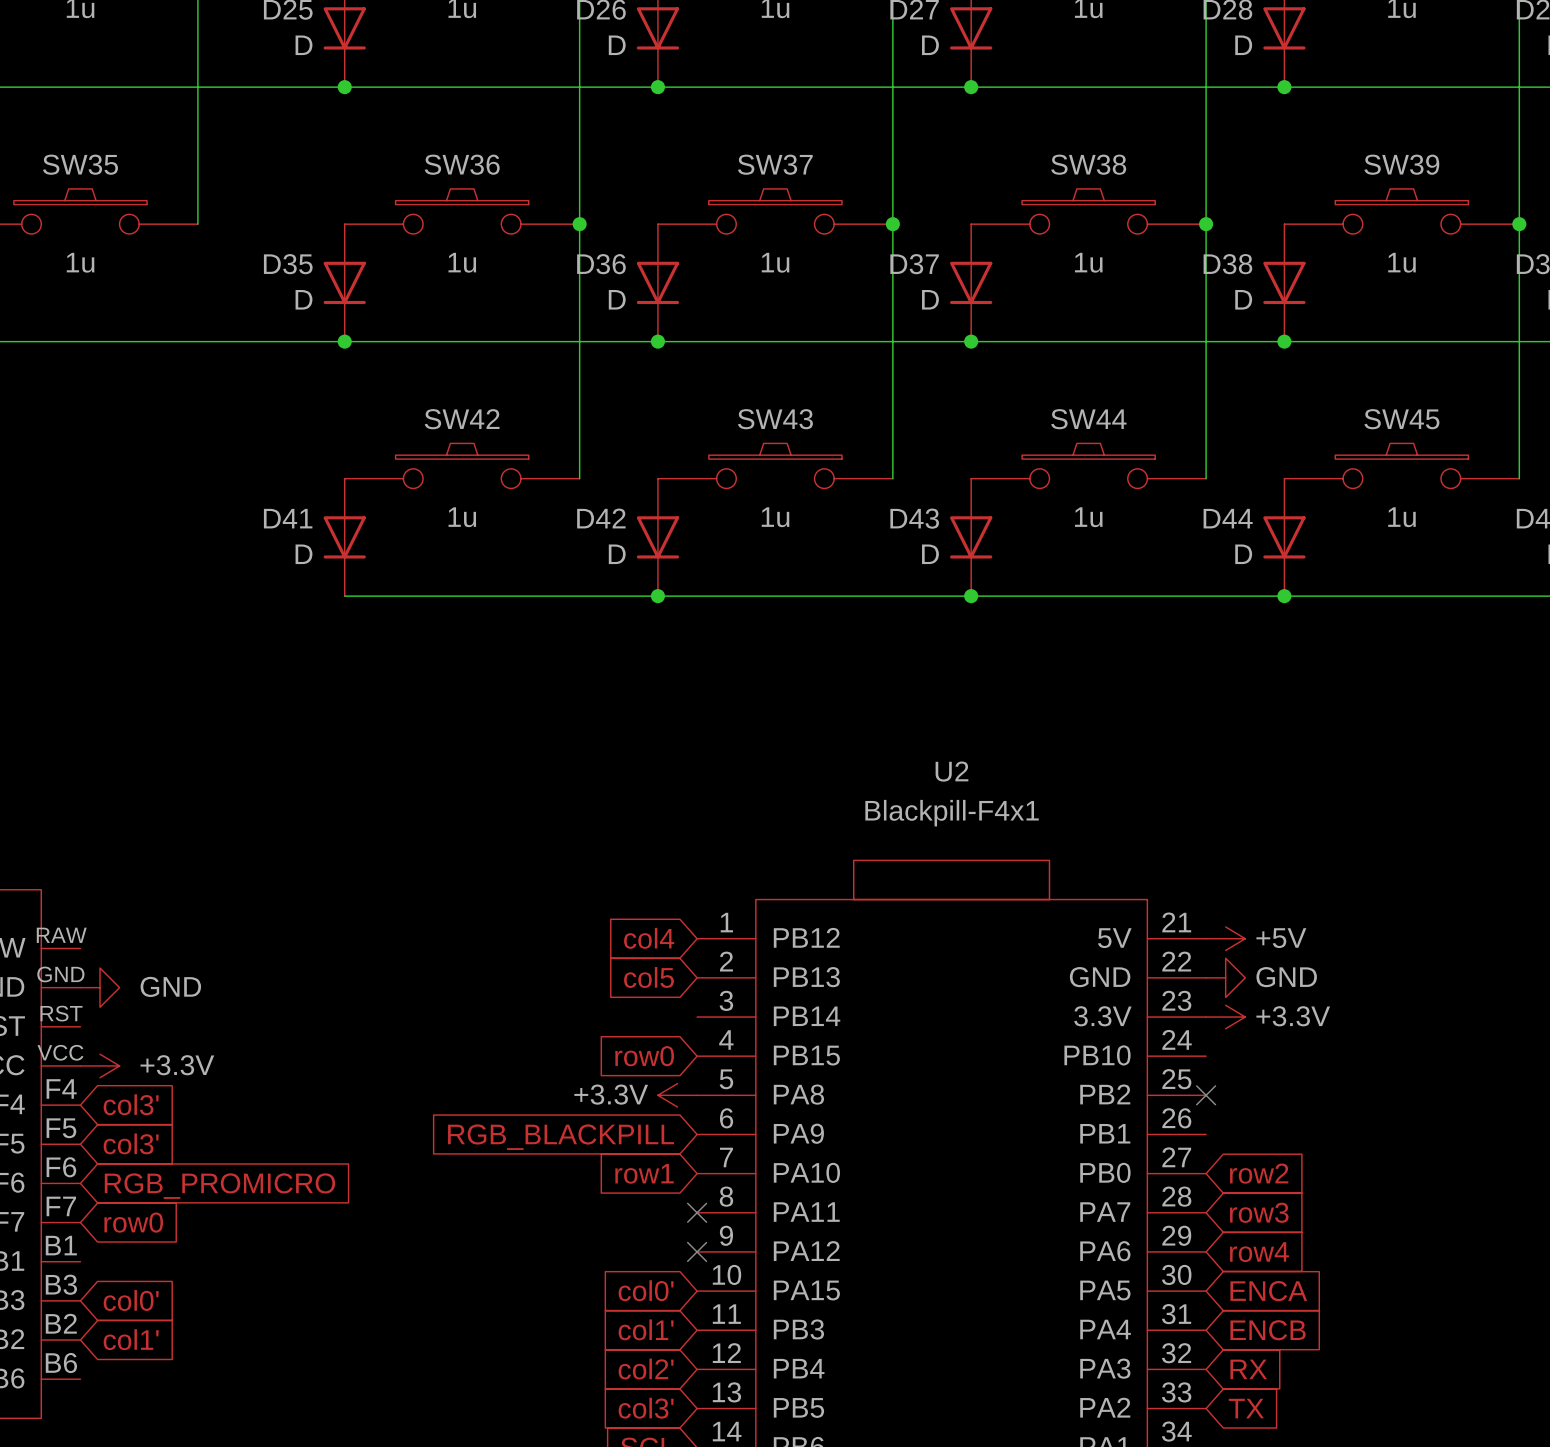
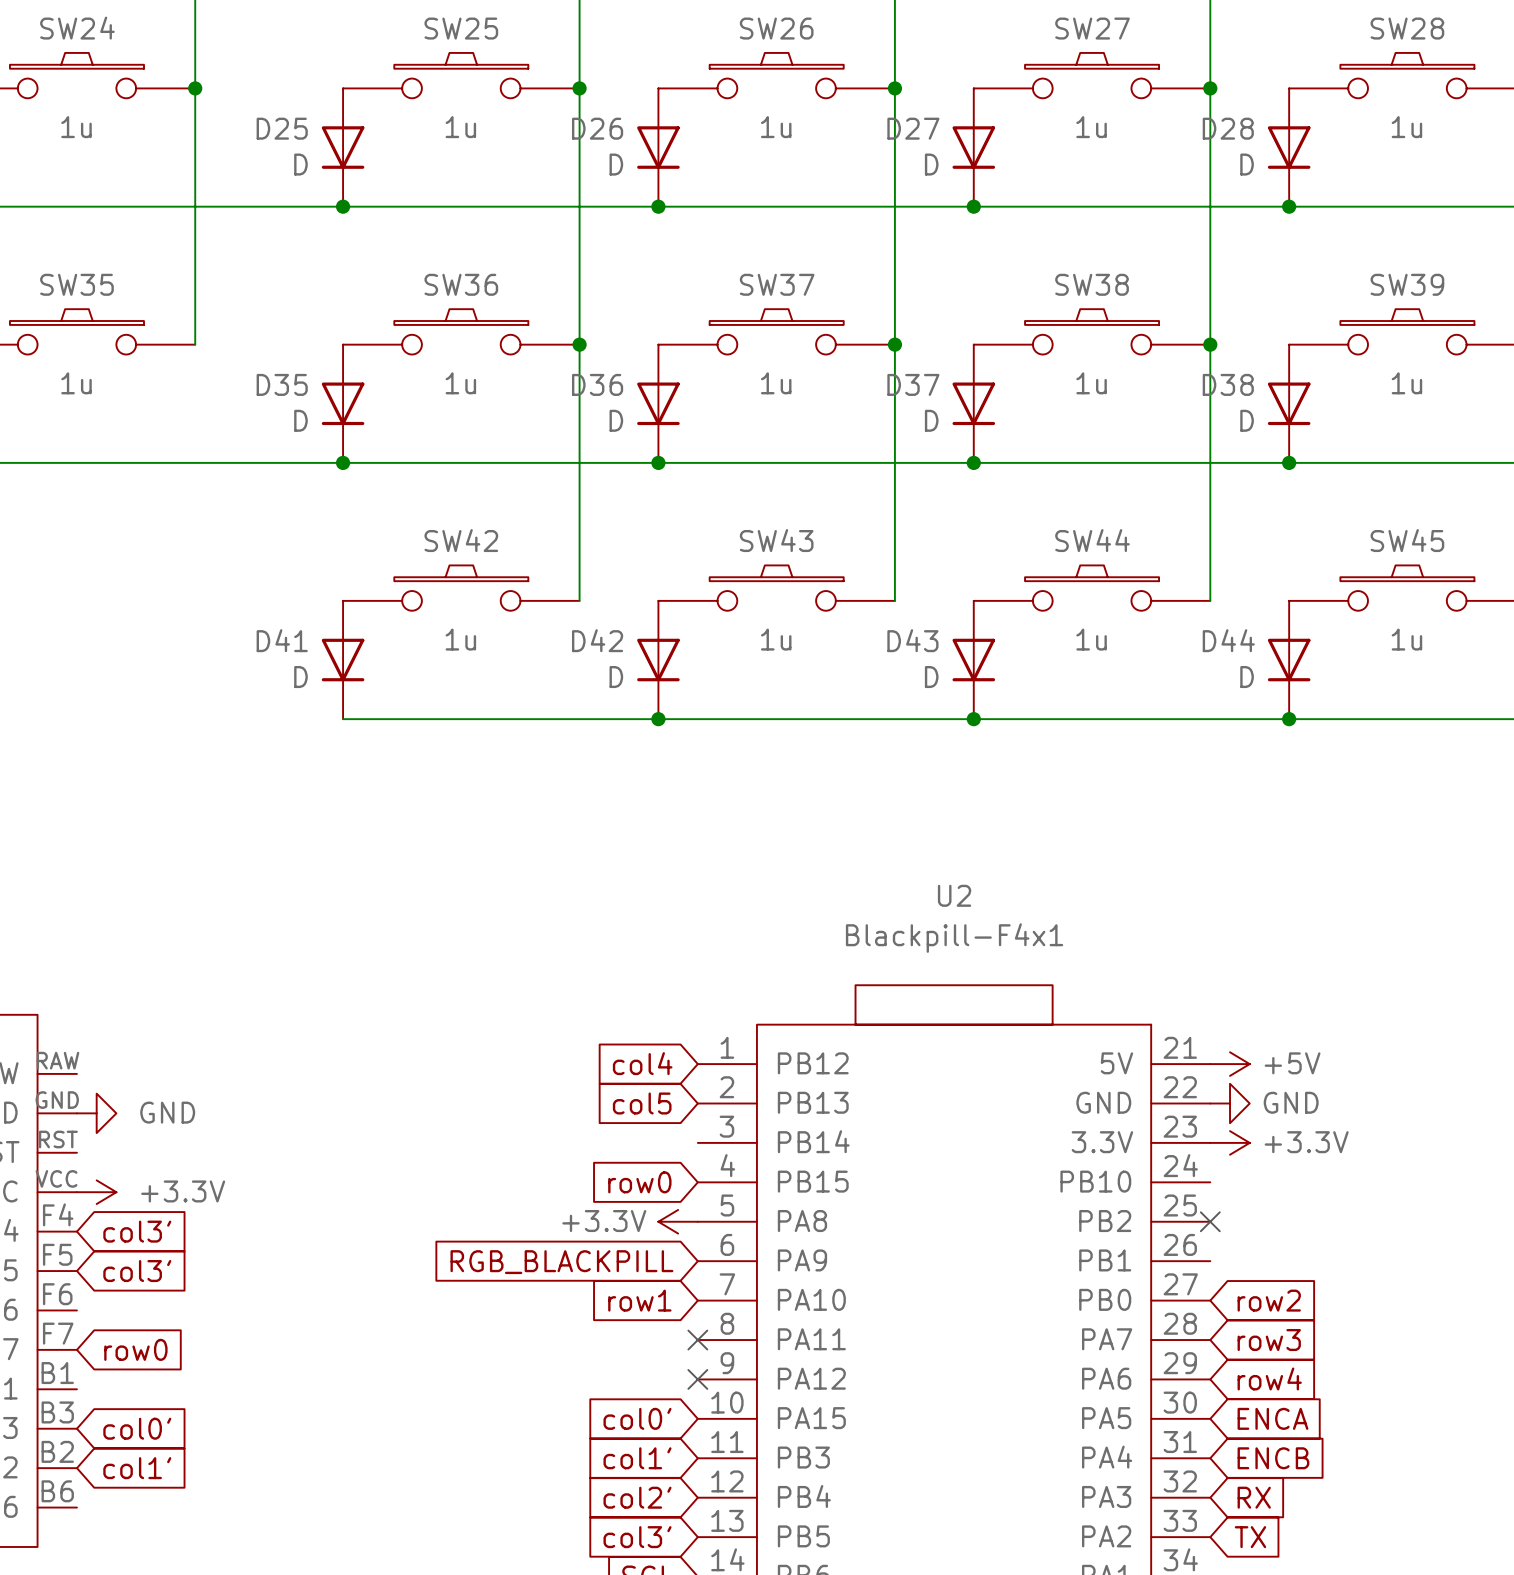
global label: RGB_PROMICRO (219, 1186) -> none

